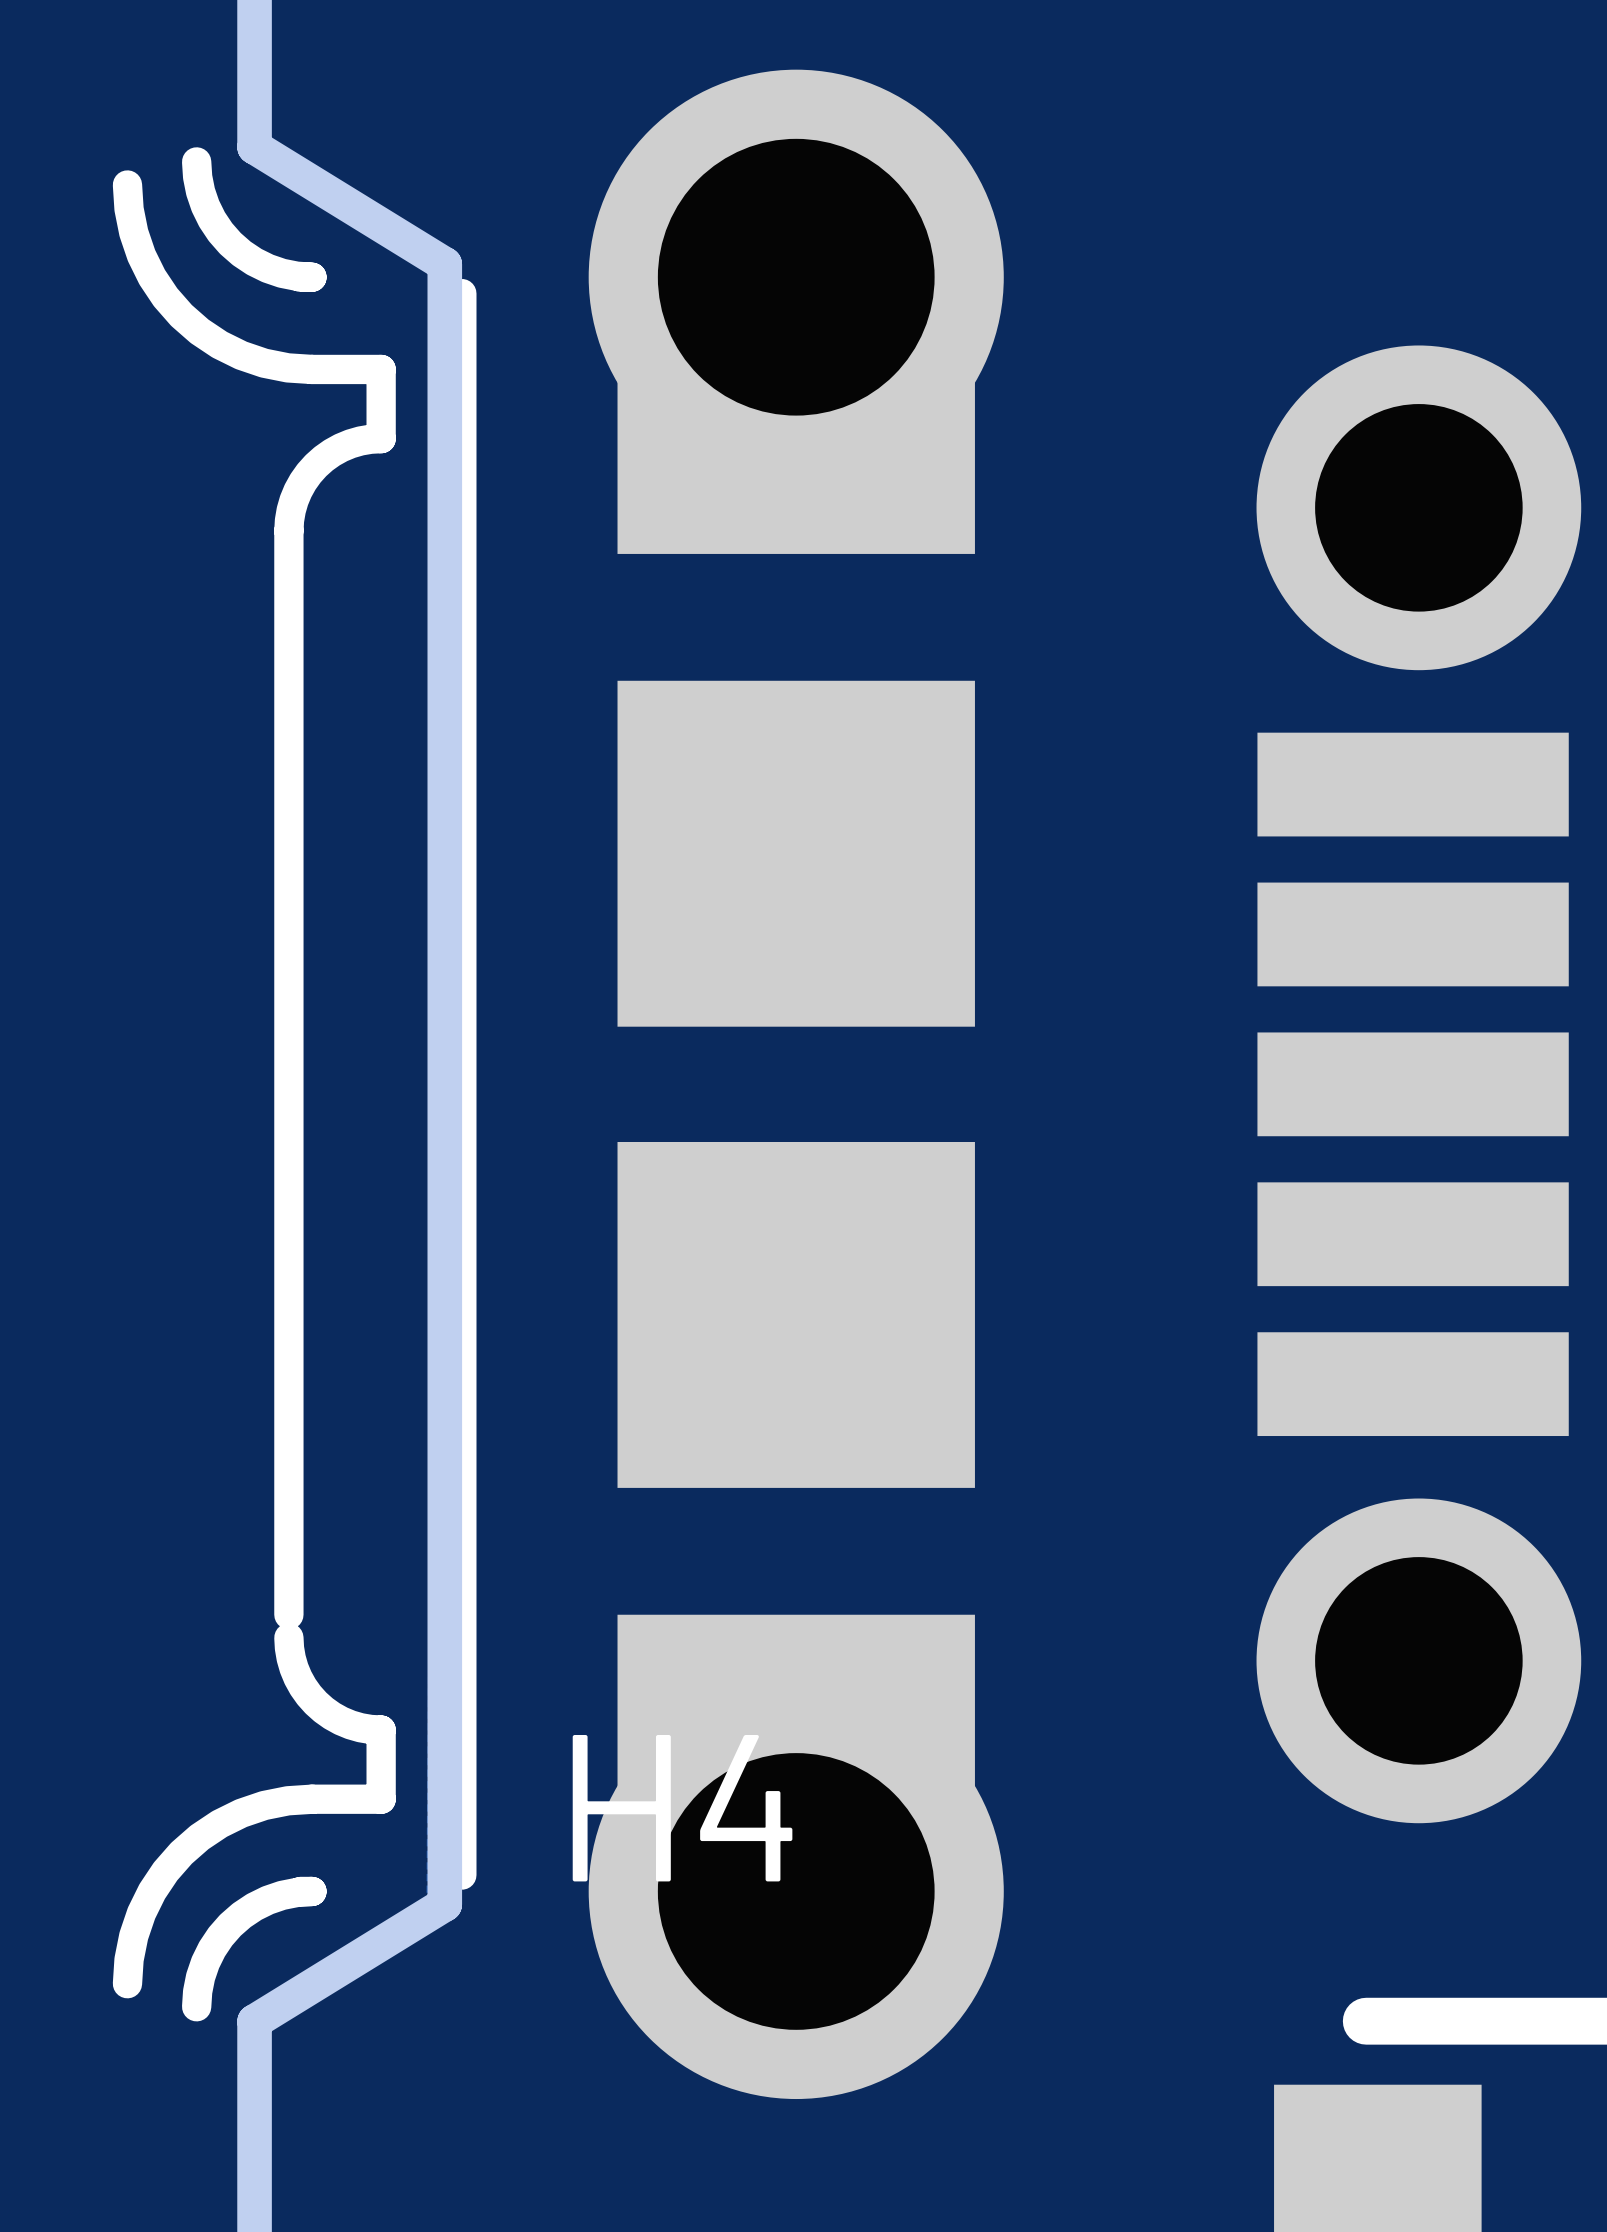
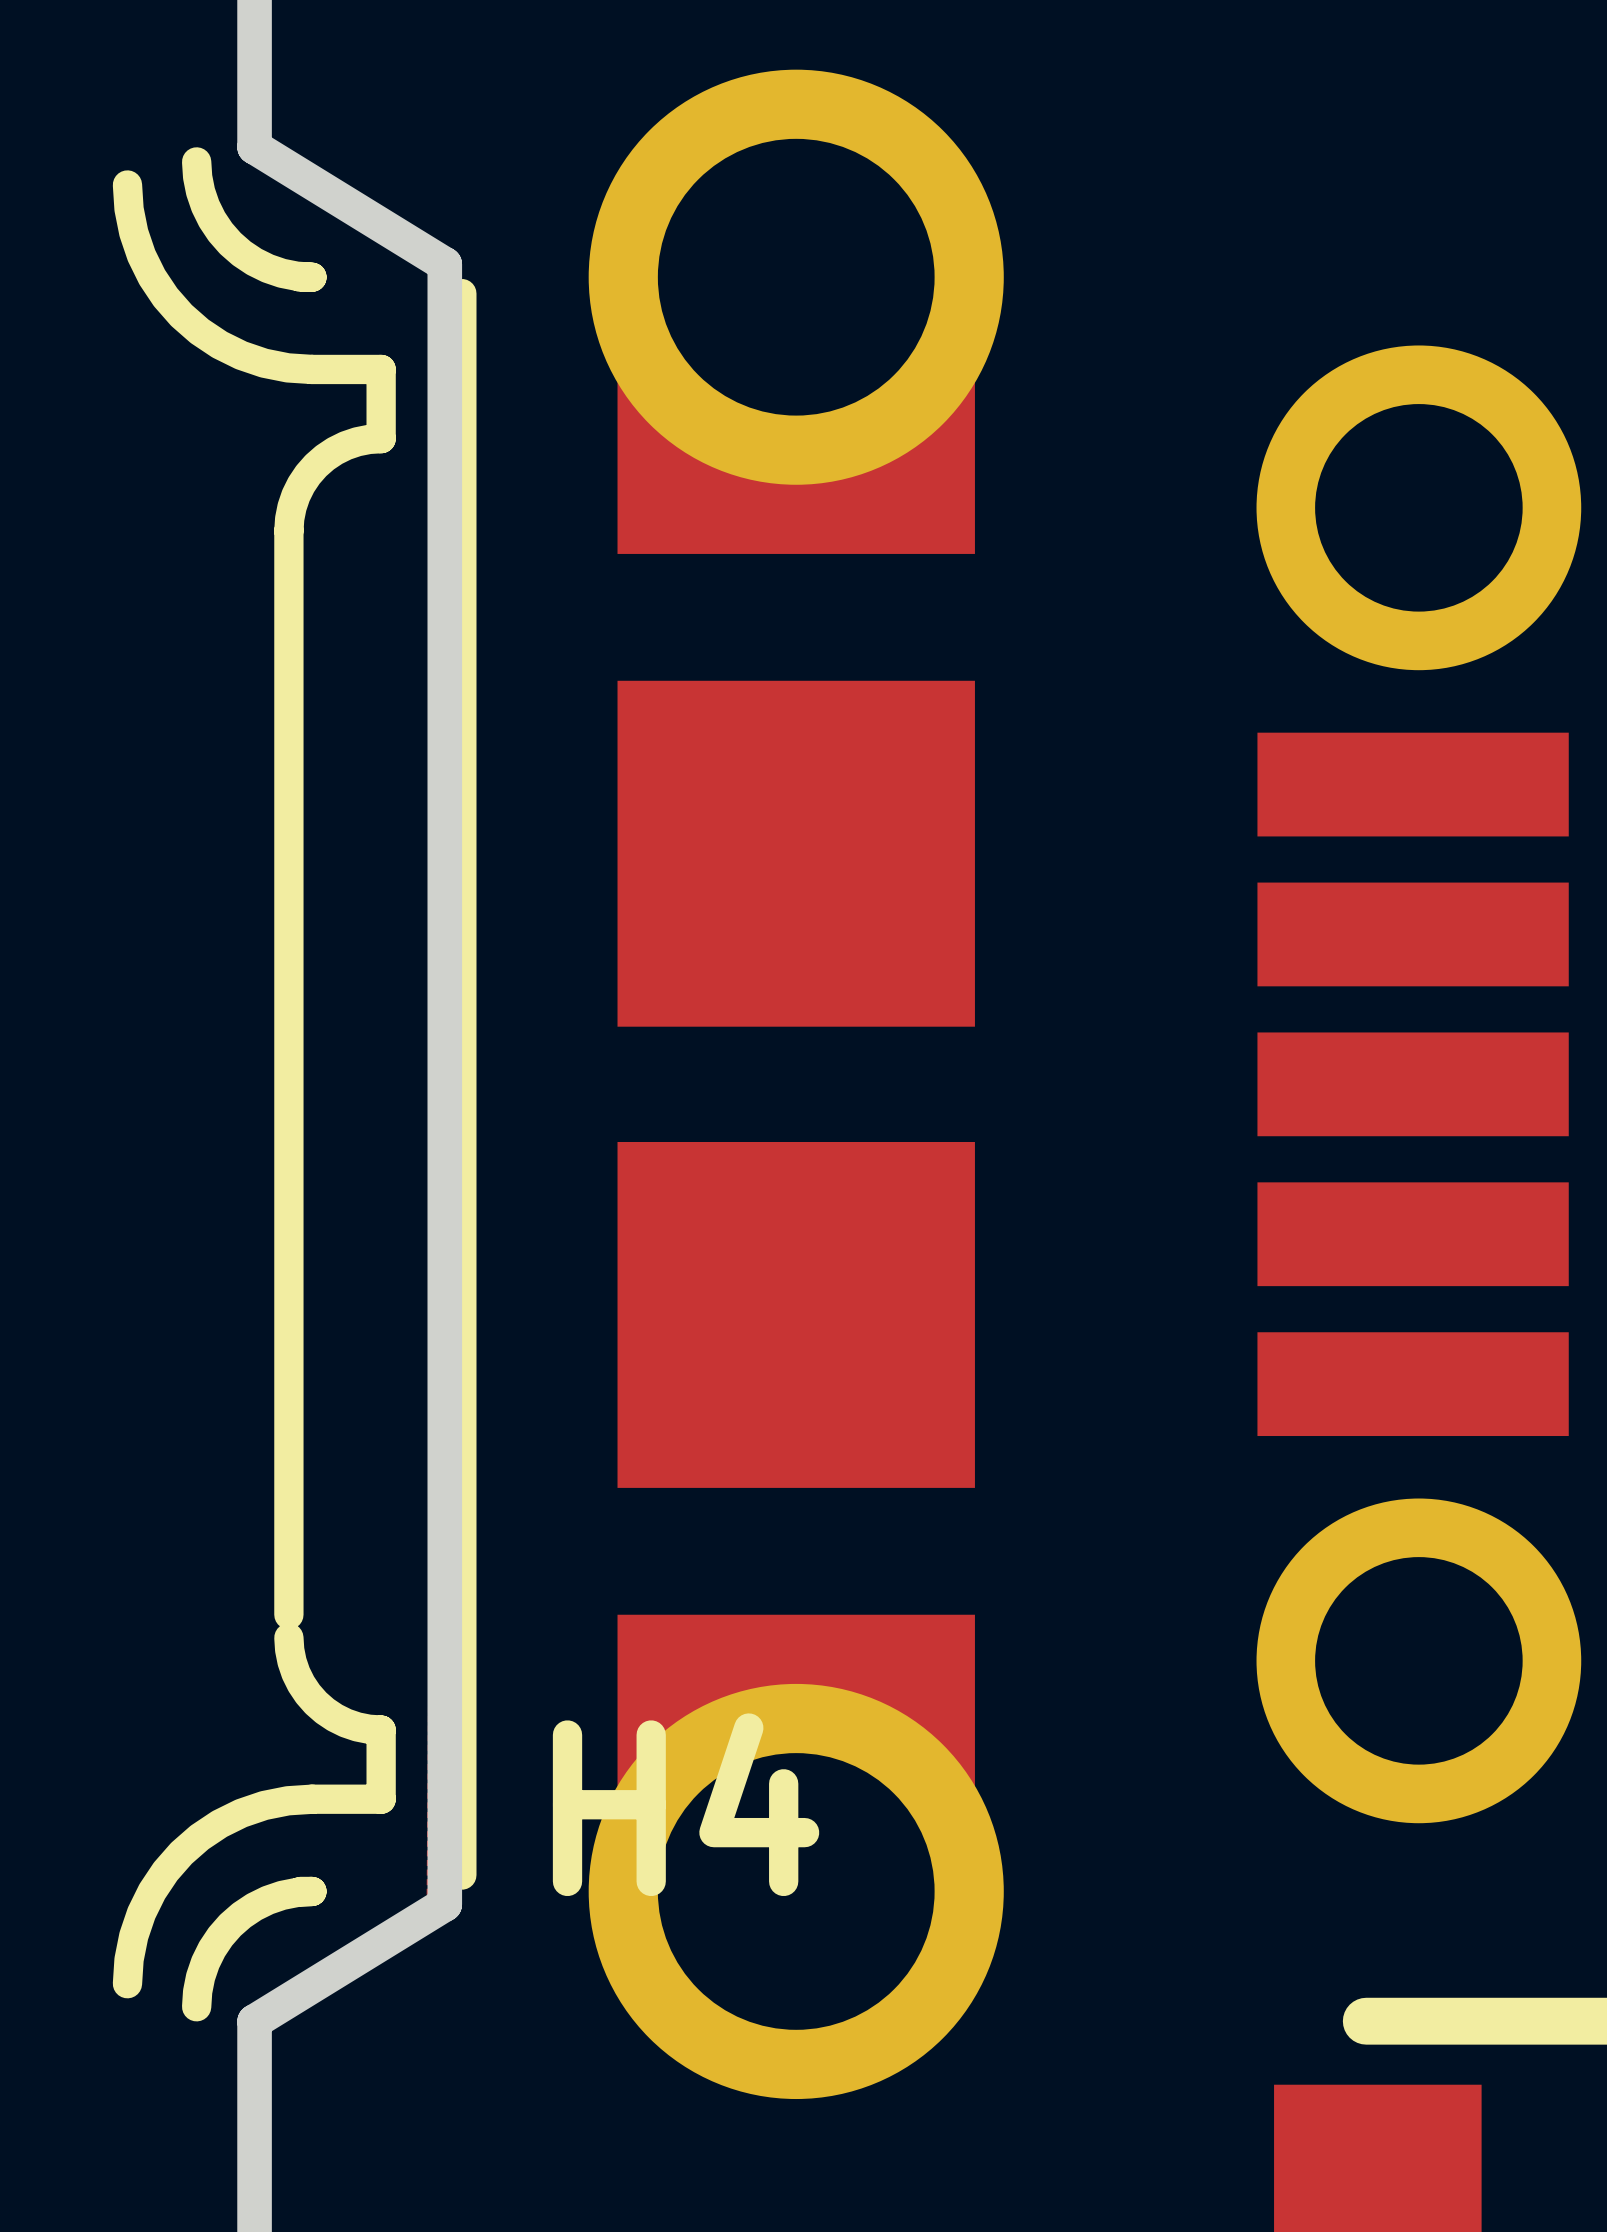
part footprint: [112, 69, 1582, 2100] -> [112, 69, 1582, 2100]

